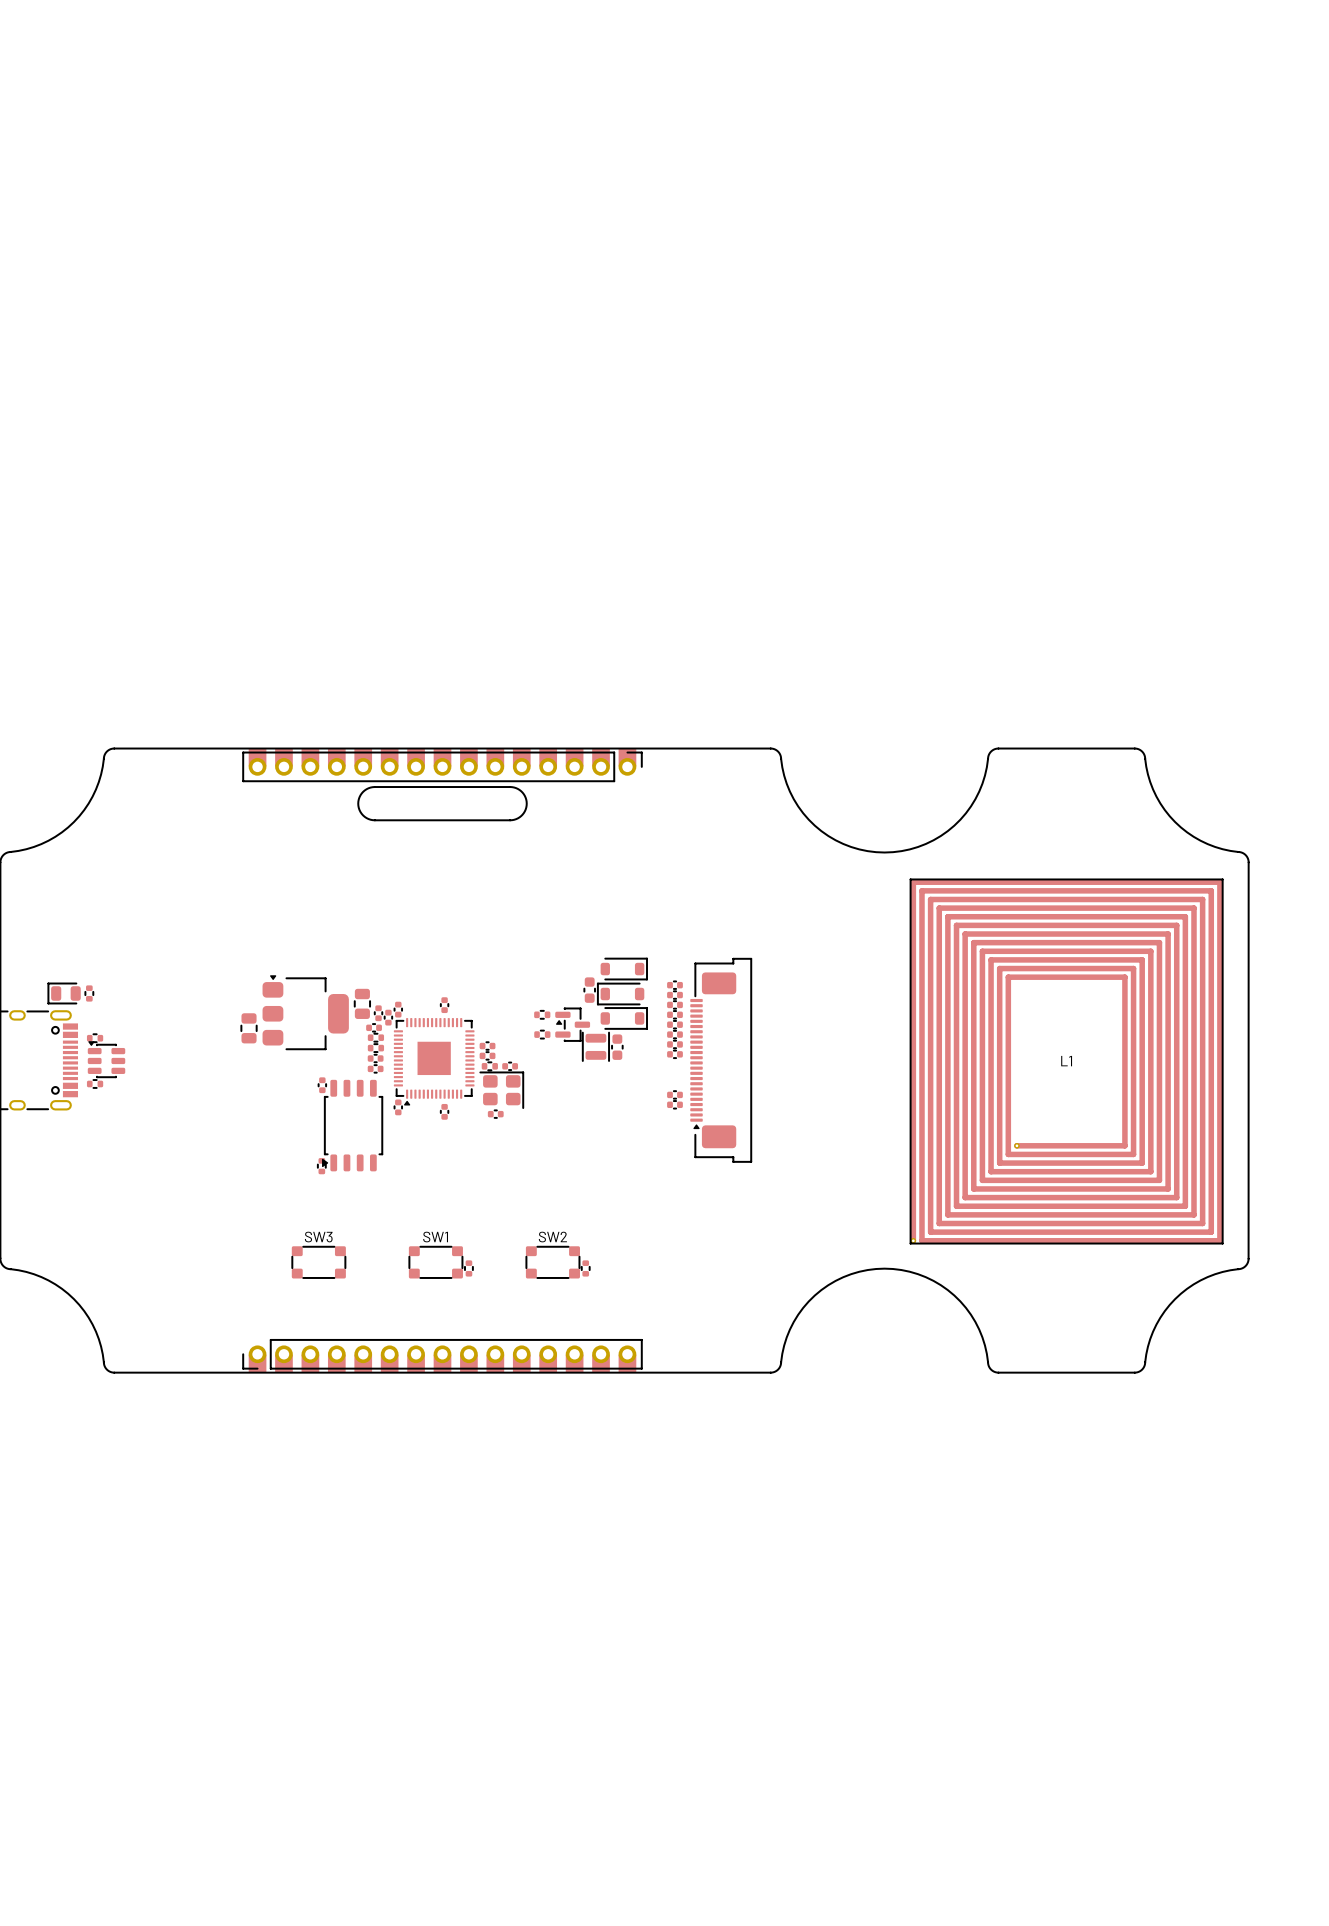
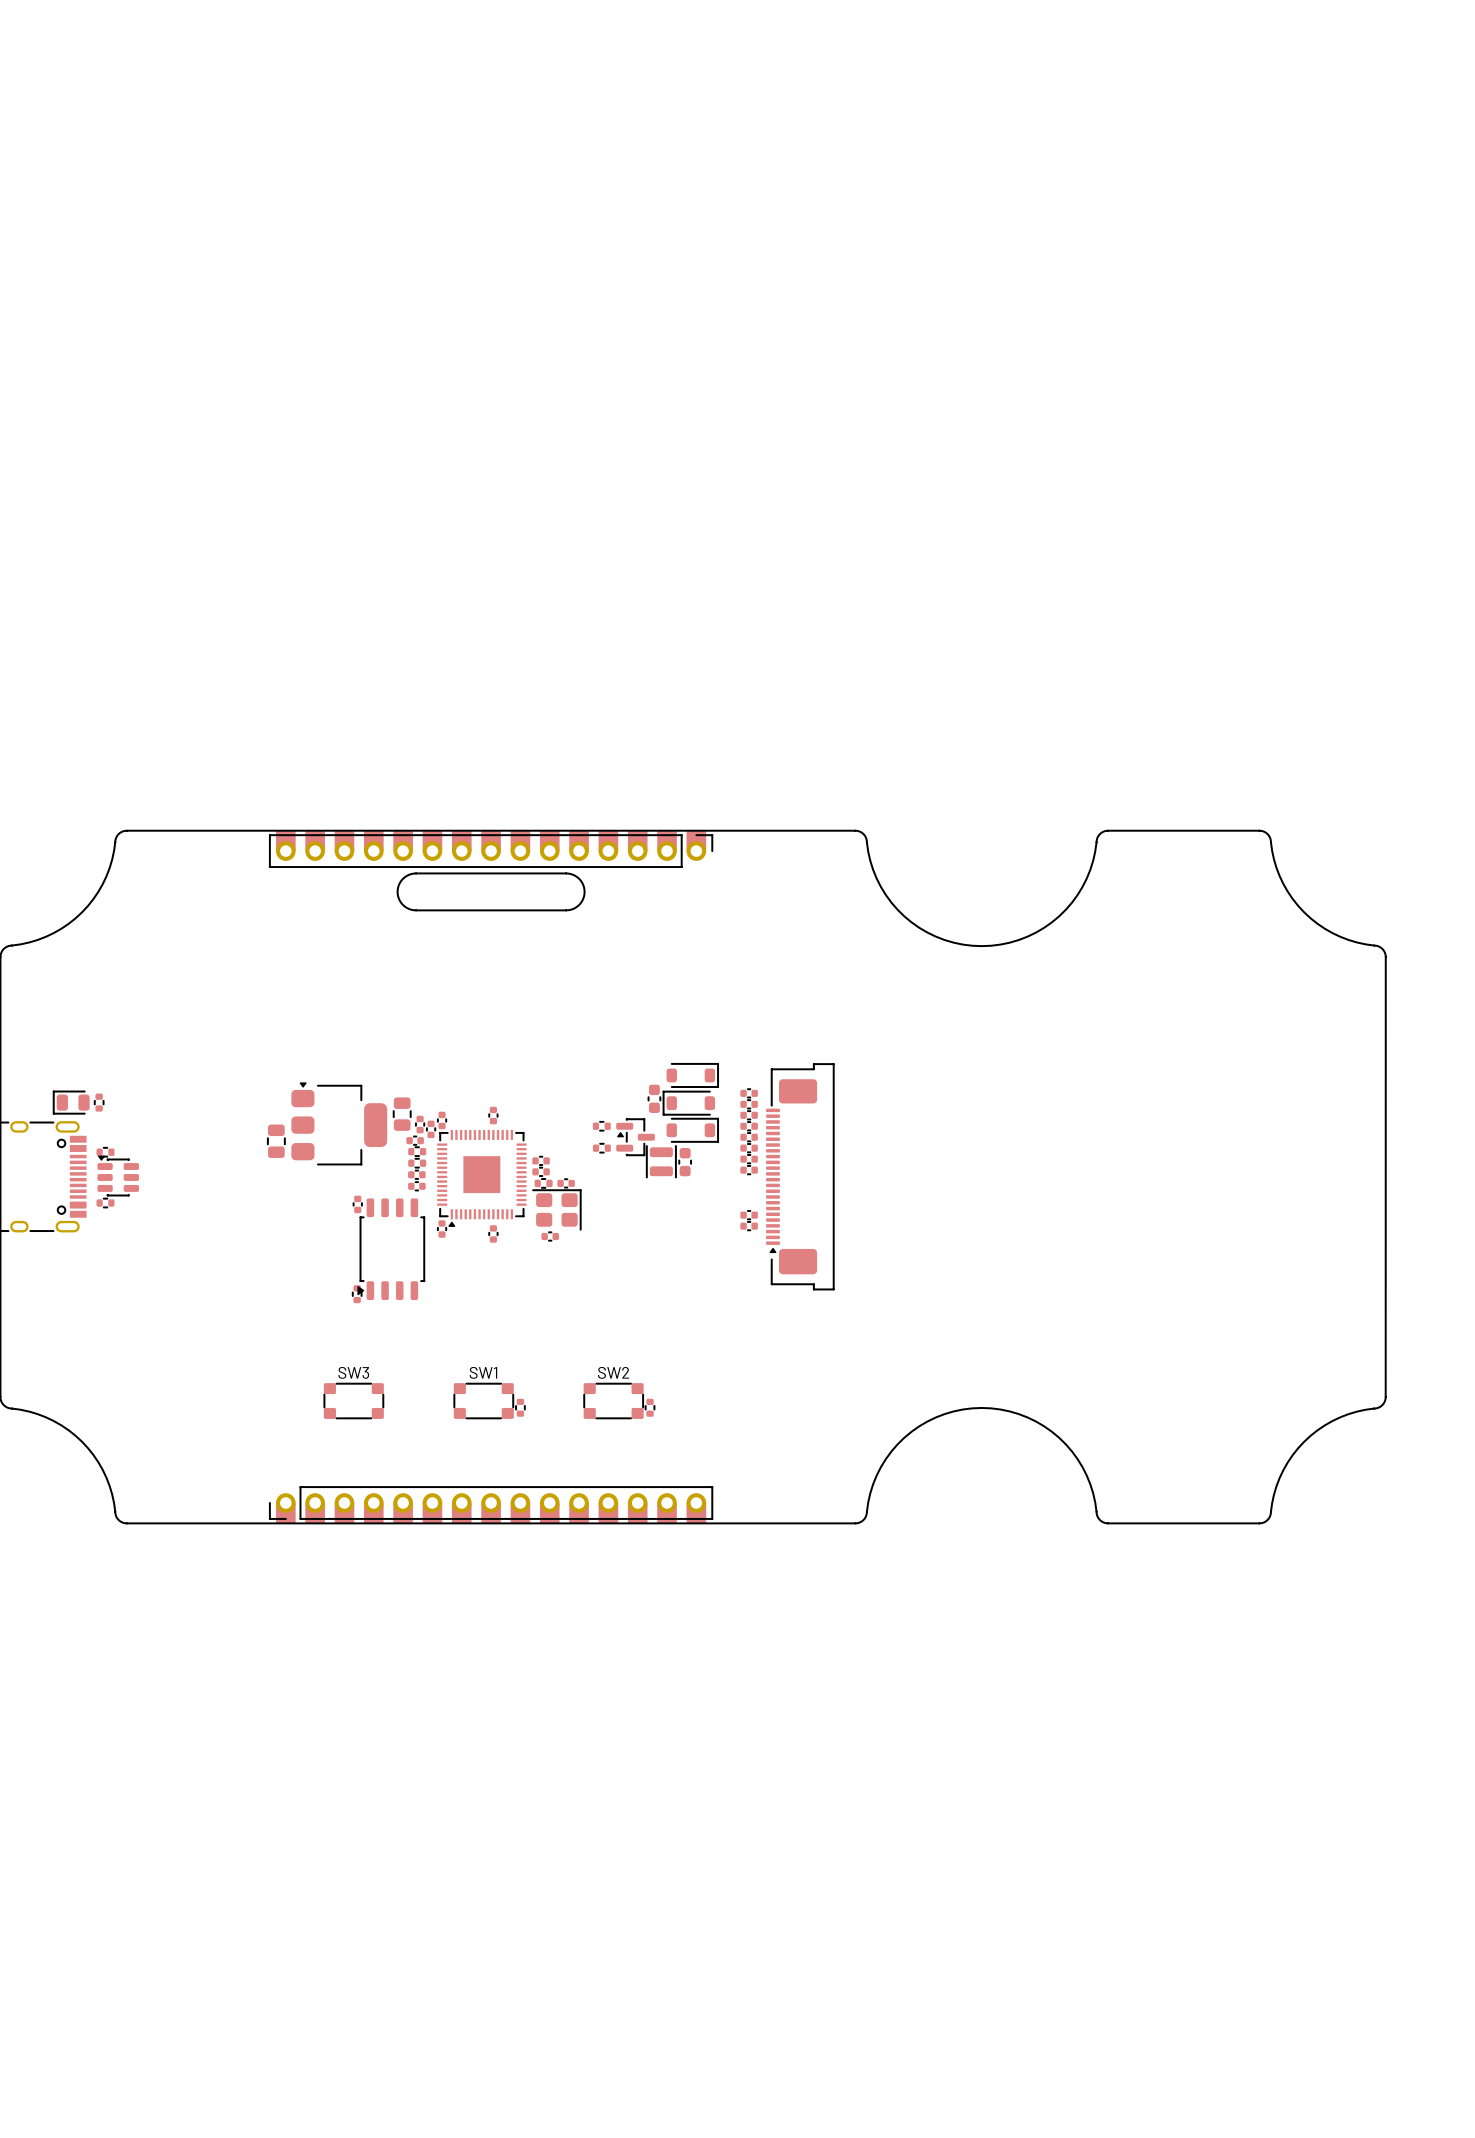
L1: (1066, 1061) -> none

